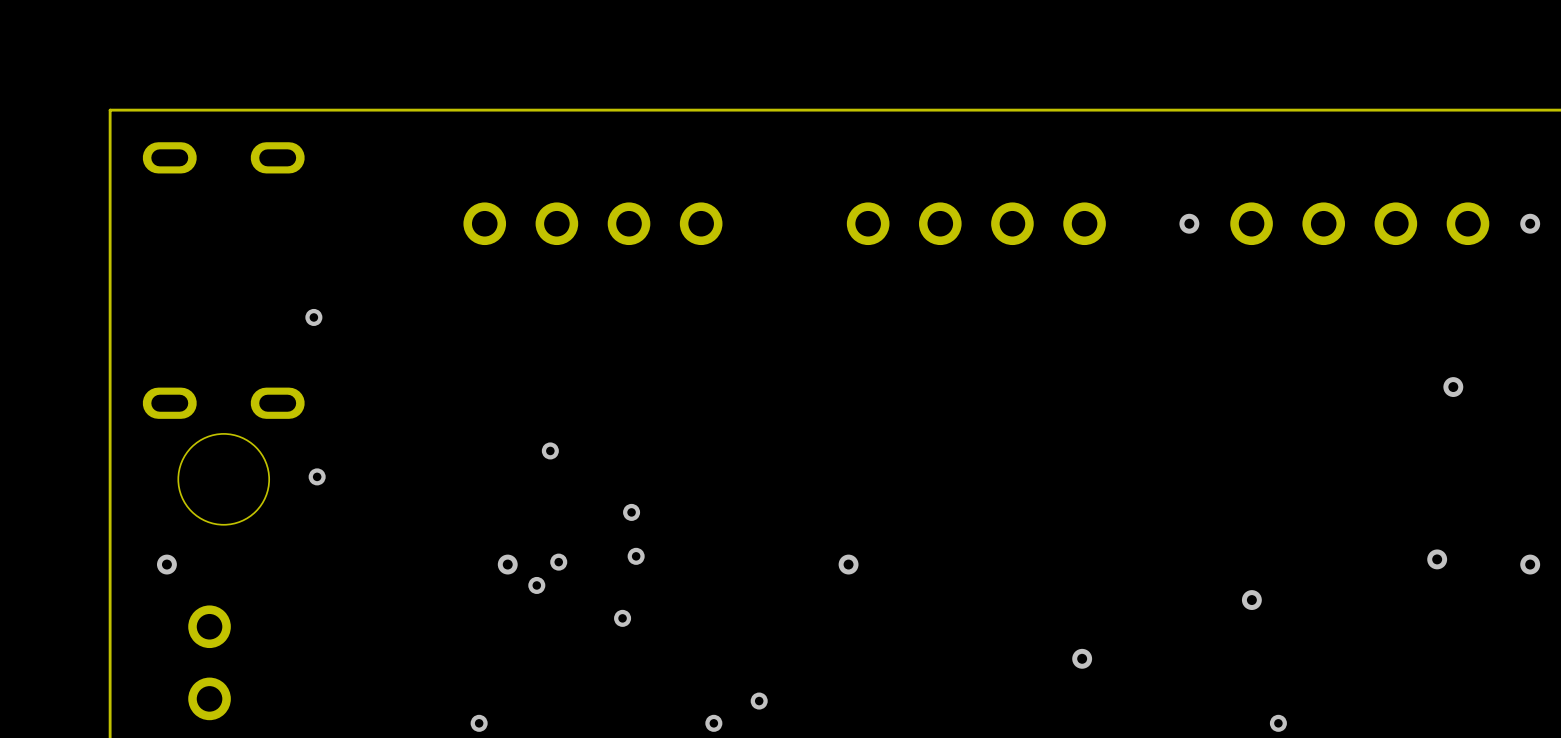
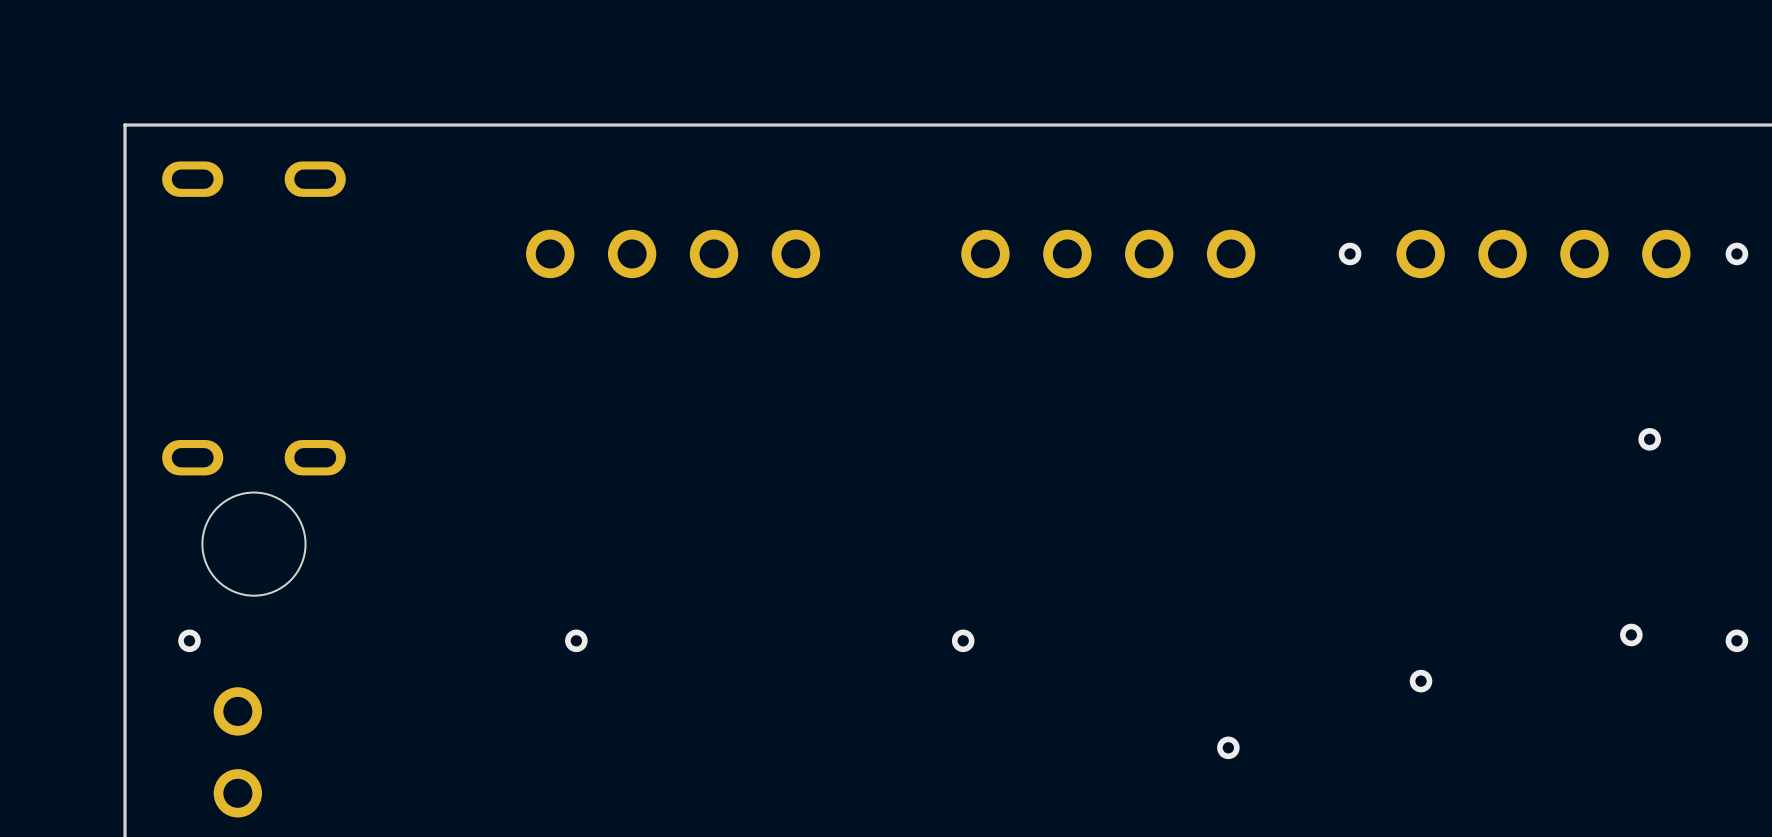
via: (313, 317) -> none
via: (550, 450) -> none
via: (317, 476) -> none
via: (631, 512) -> none
via: (636, 556) -> none
via: (558, 562) -> none
via: (536, 585) -> none
via: (622, 618) -> none
via: (759, 701) -> none
via: (479, 723) -> none
via: (713, 723) -> none
via: (1278, 723) -> none

